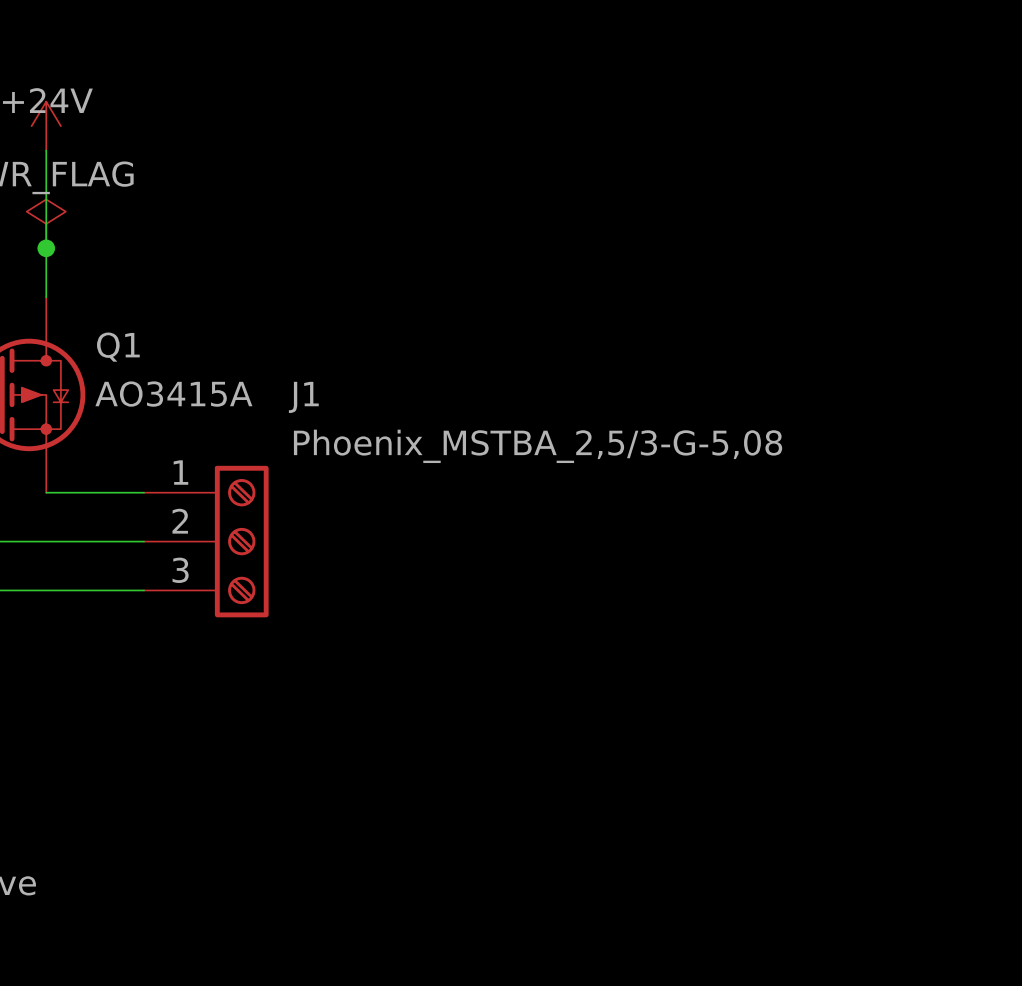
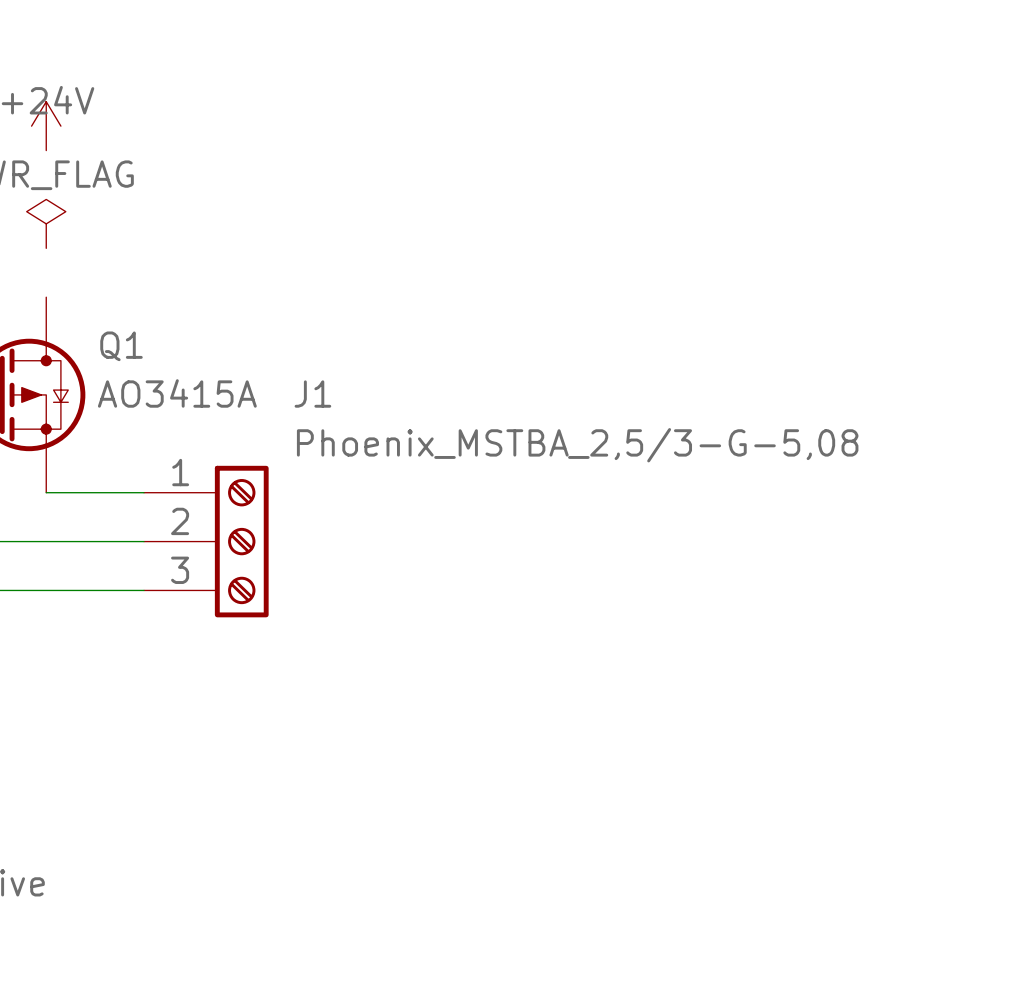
wire: (46, 150) (46, 297) -> none
junction: (46, 248) -> none

